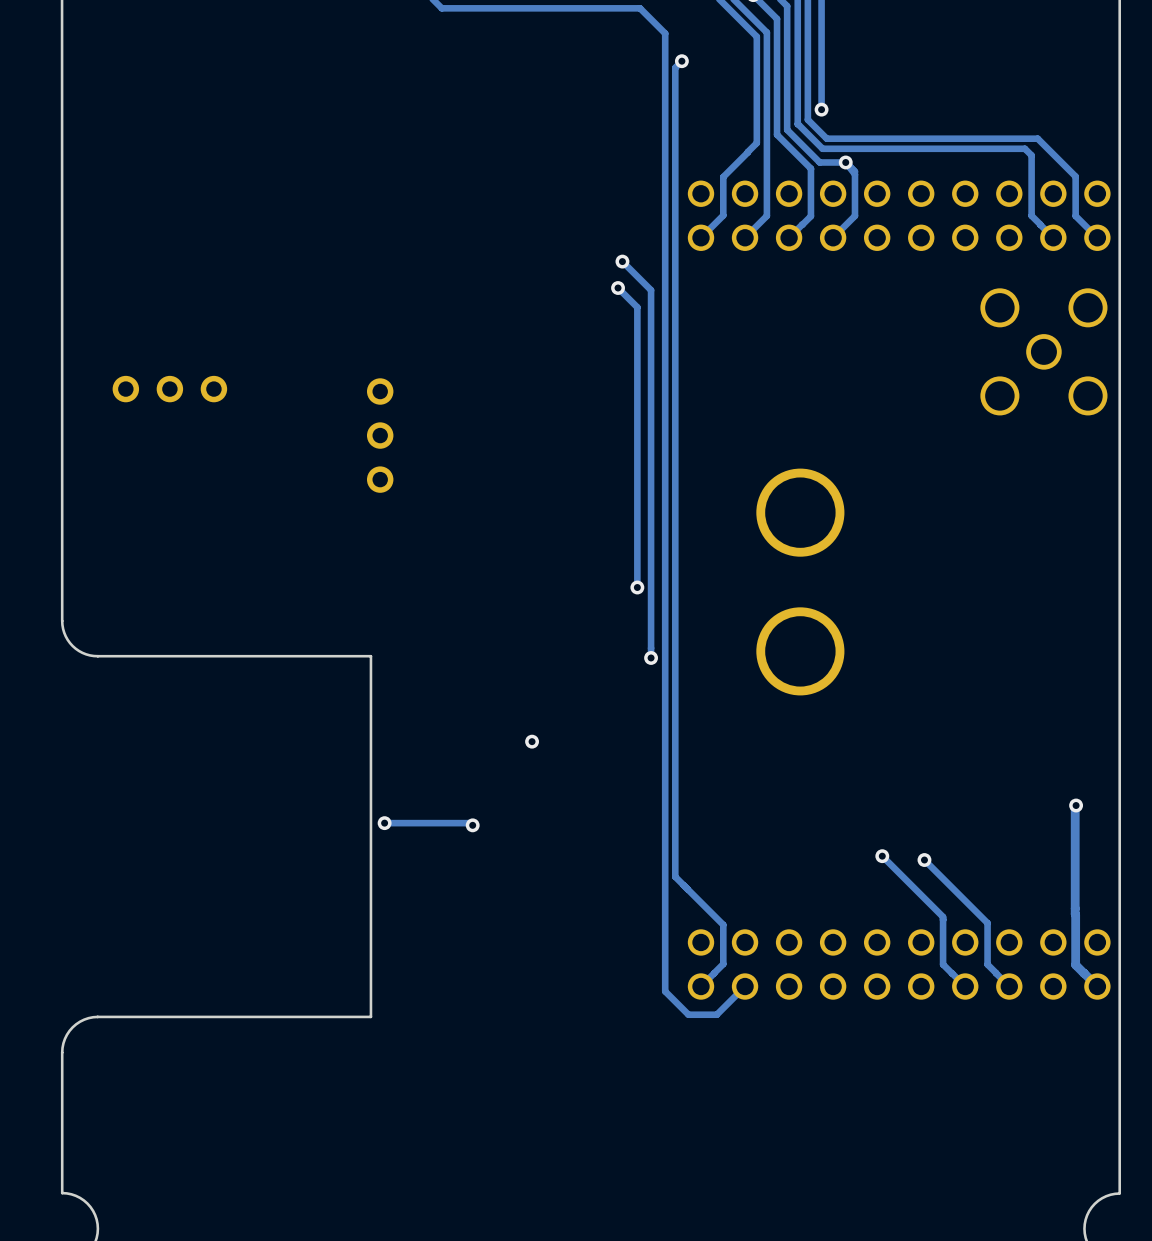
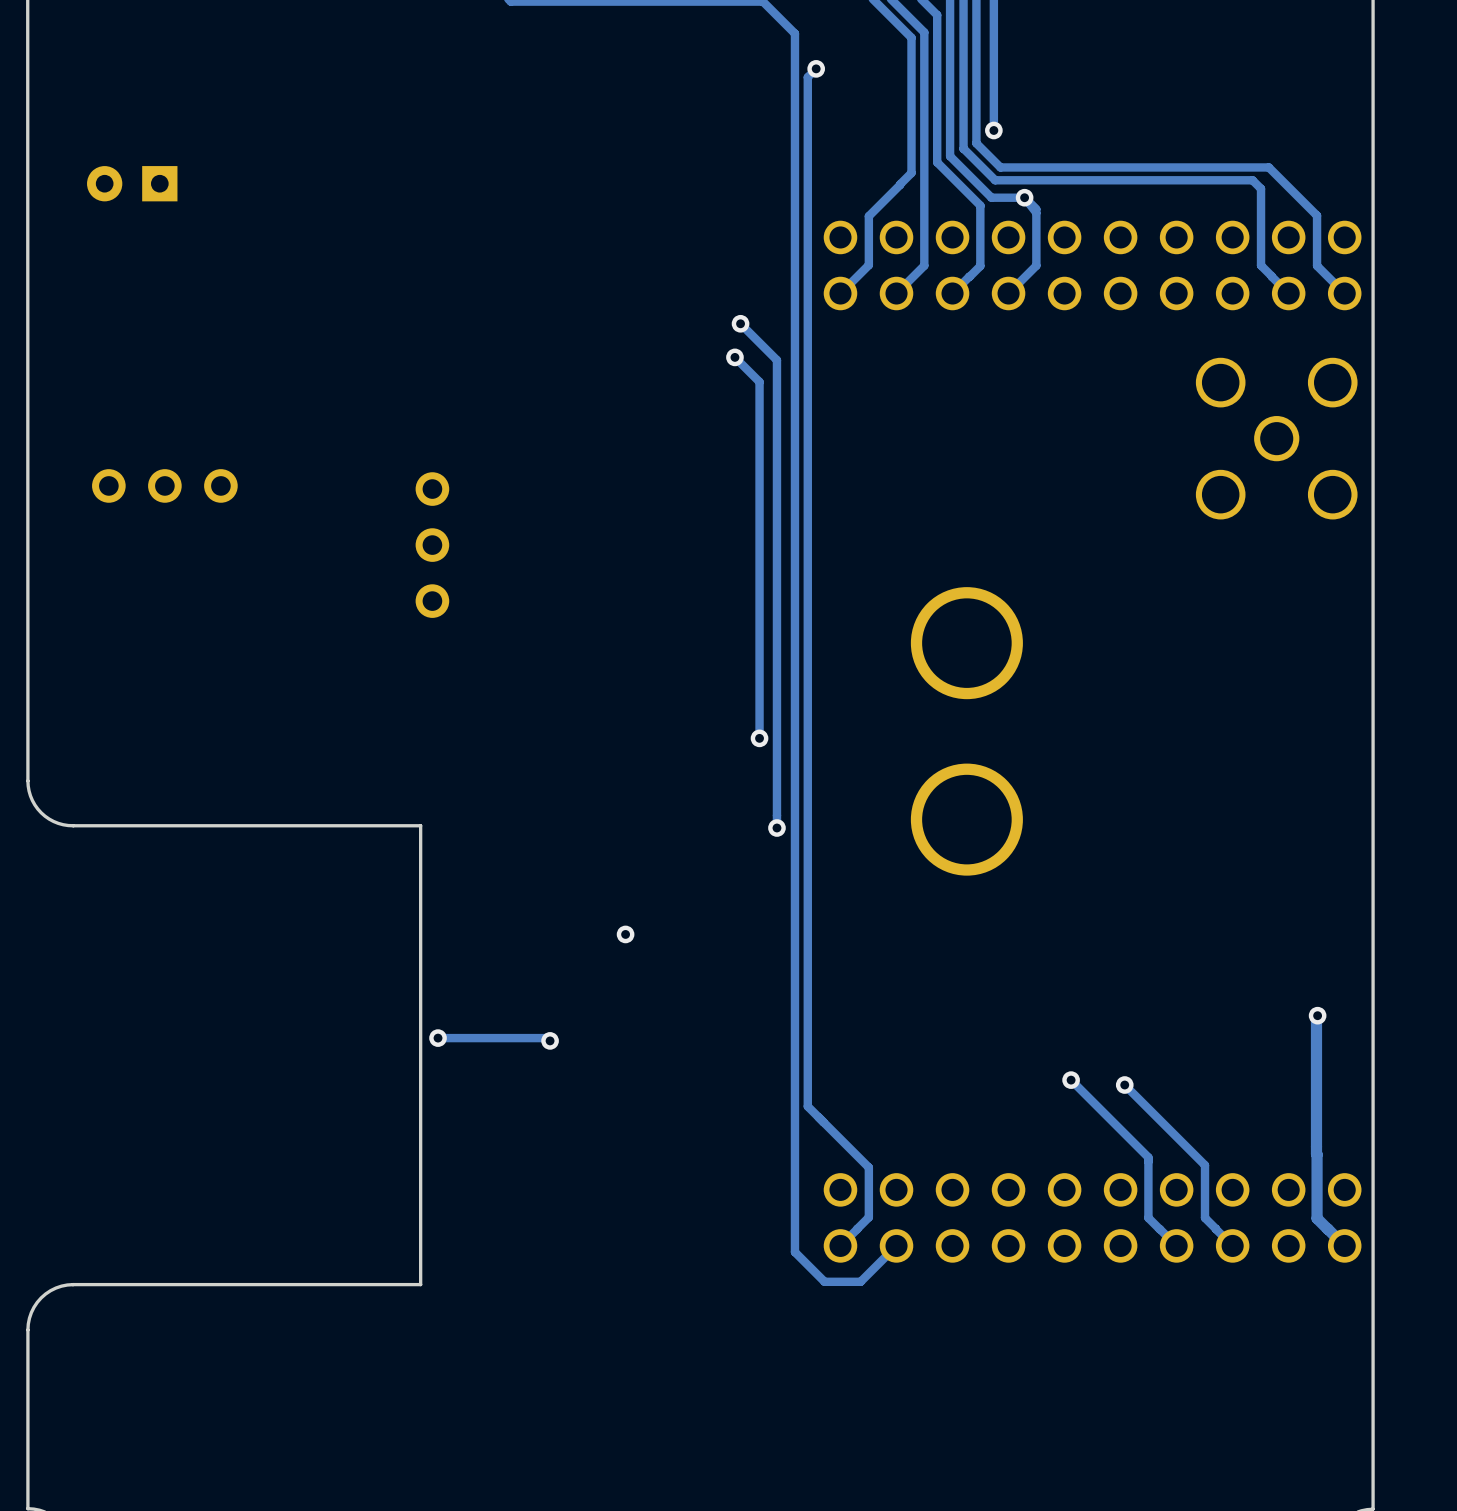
part: none -> (132, 183)

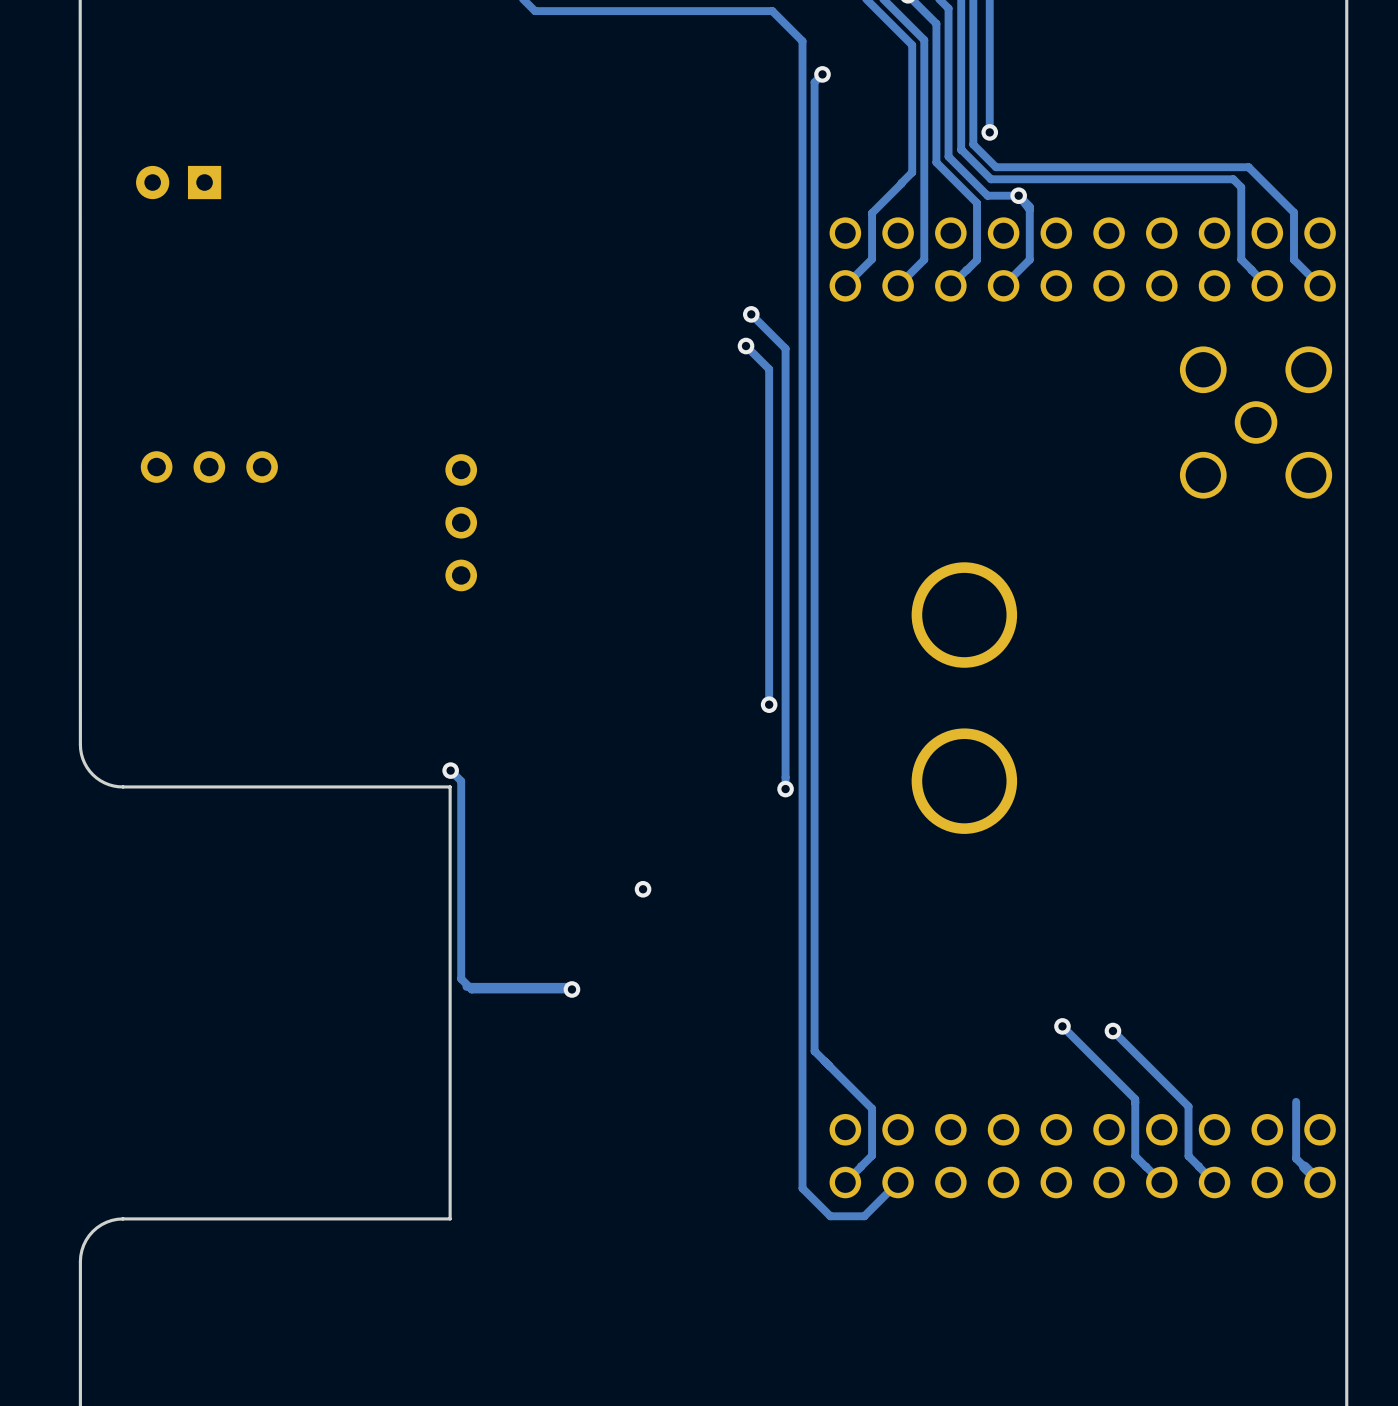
track: none -> (450, 770) (461, 781) (461, 978) (471, 989) (571, 989)
via: none -> (450, 770)
track: (1317, 1015) (1317, 1218) (1327, 1229) -> (1296, 1101) (1296, 1158) (1304, 1166)
via: (1317, 1015) -> none
via: (438, 1038) -> none

